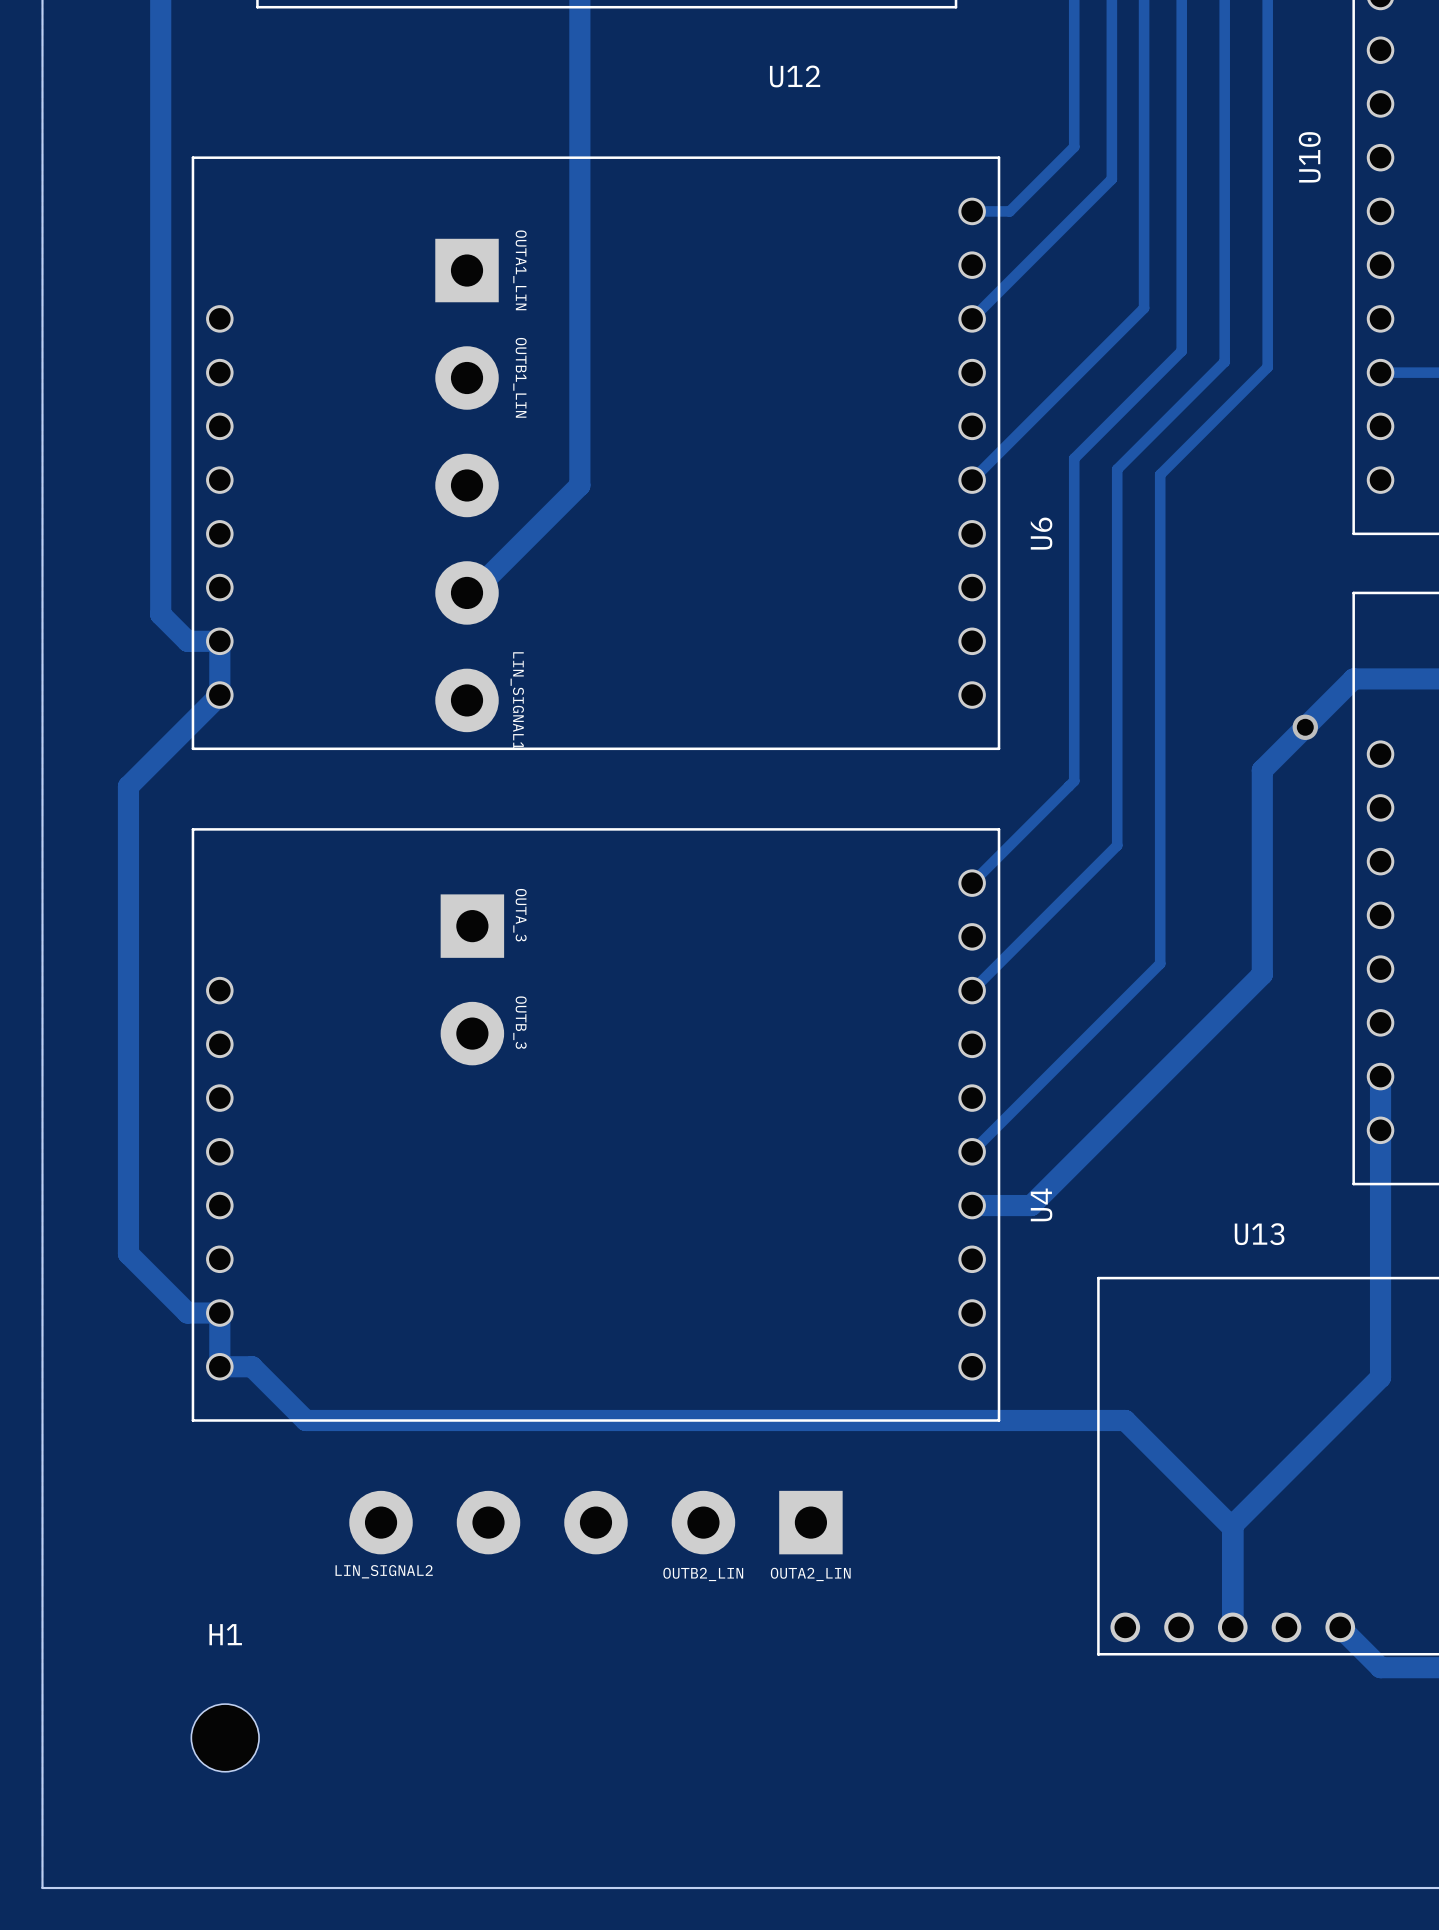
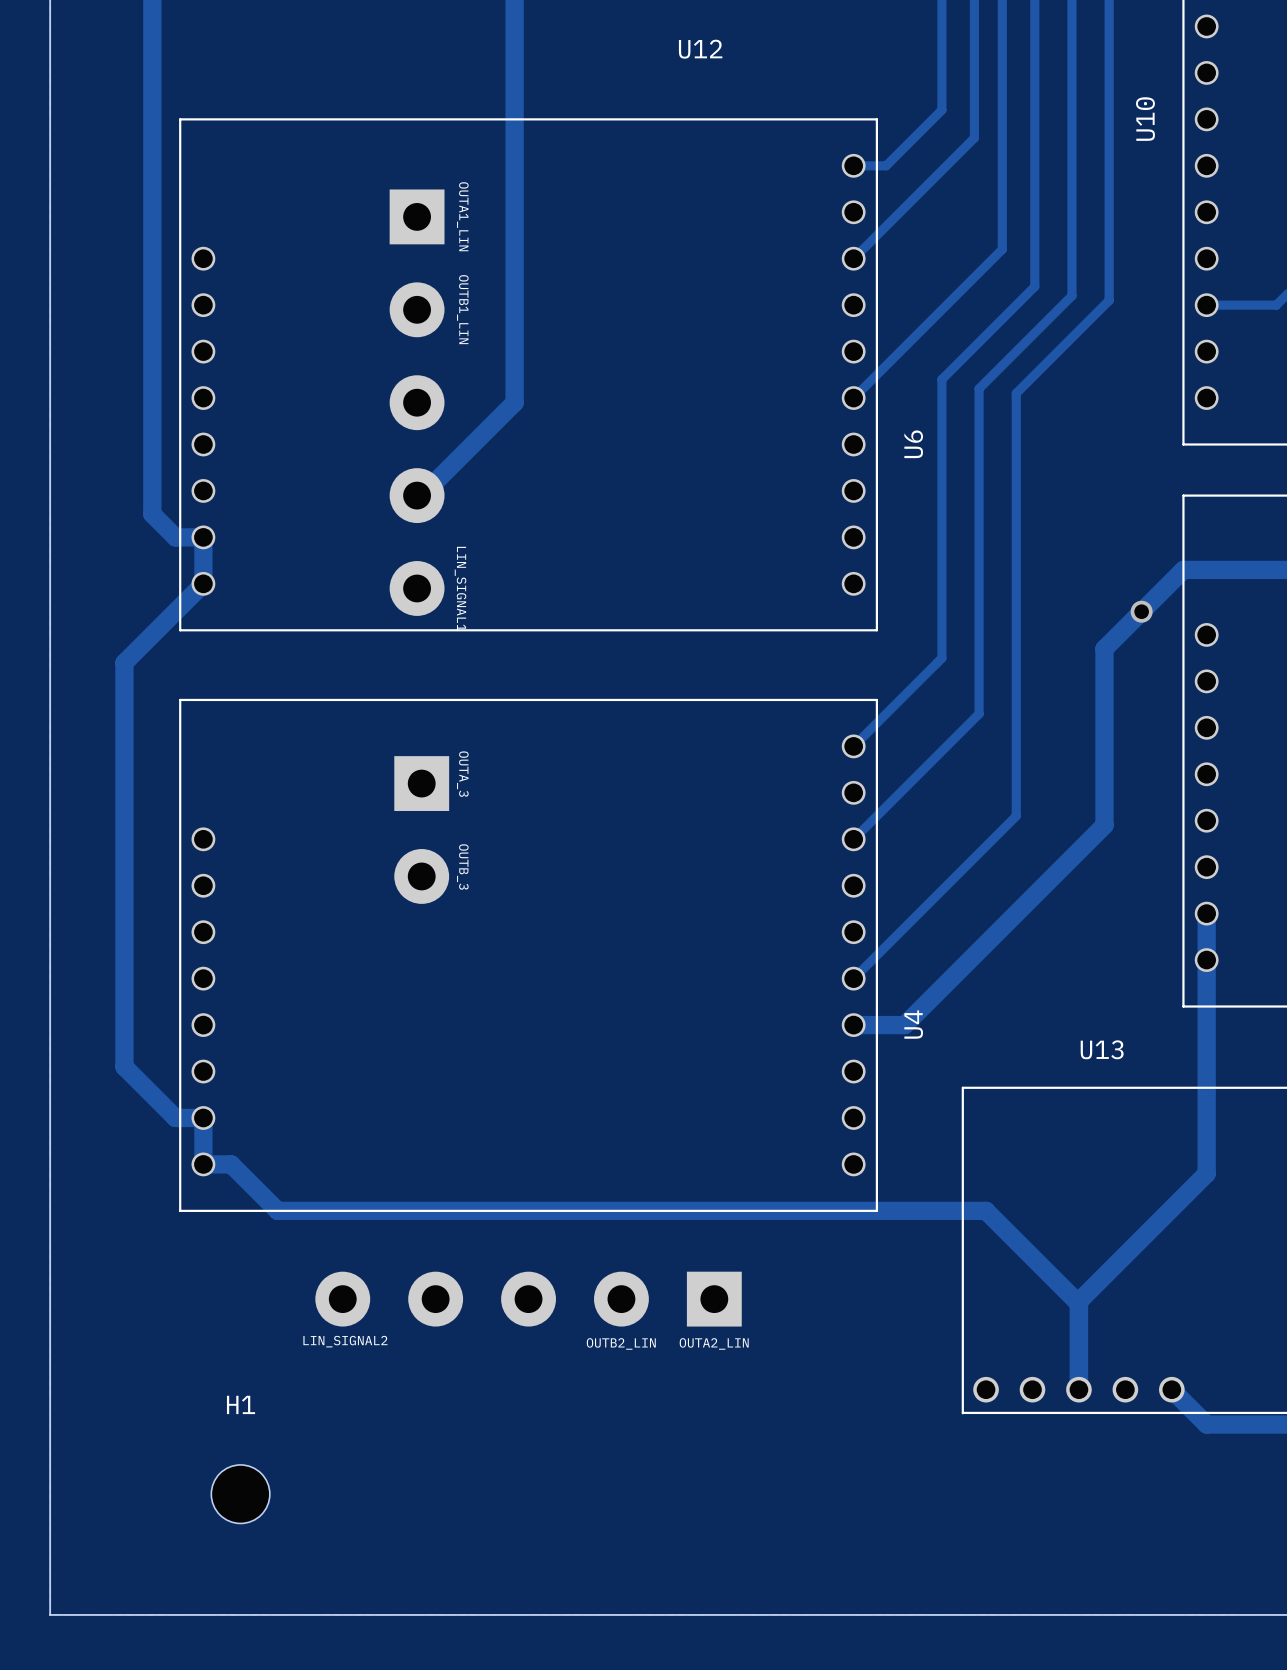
H1 position: (225, 1737) -> (240, 1494)

